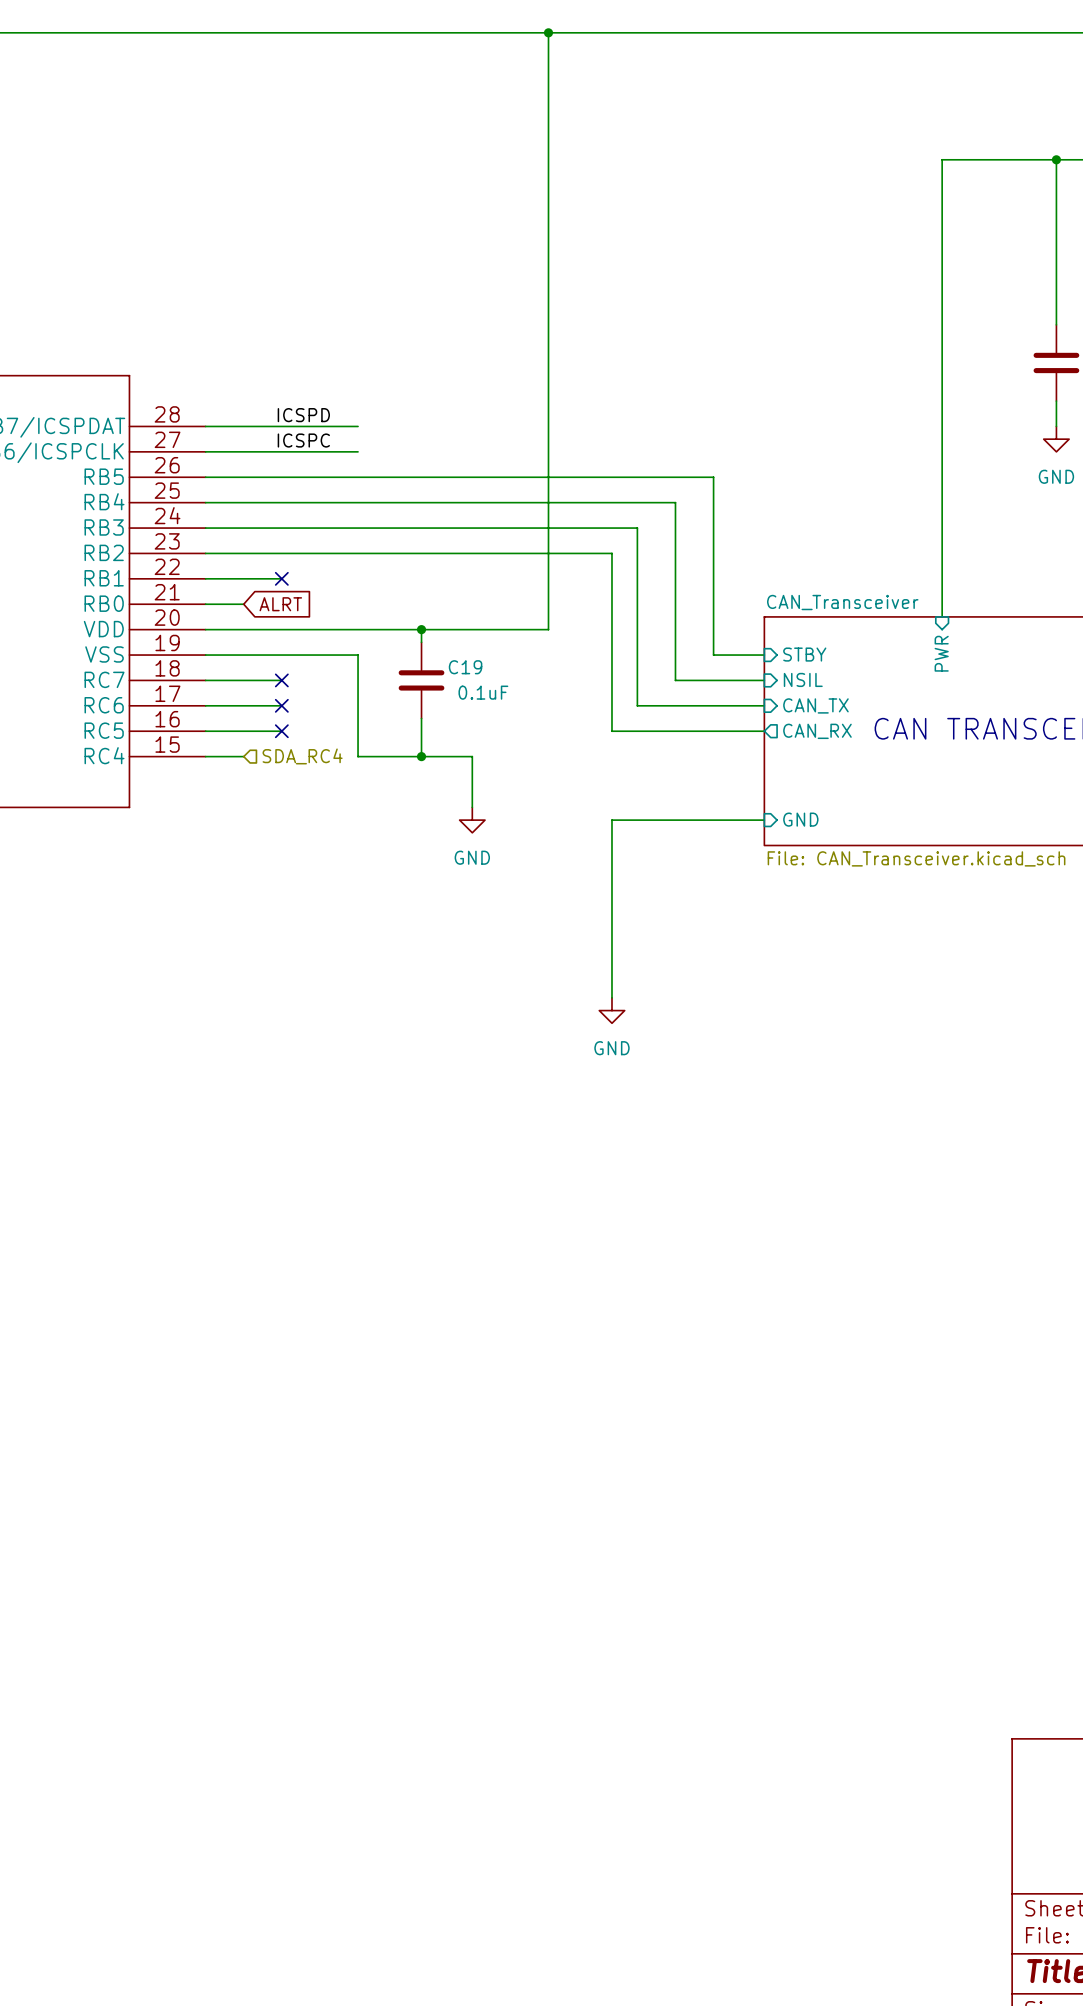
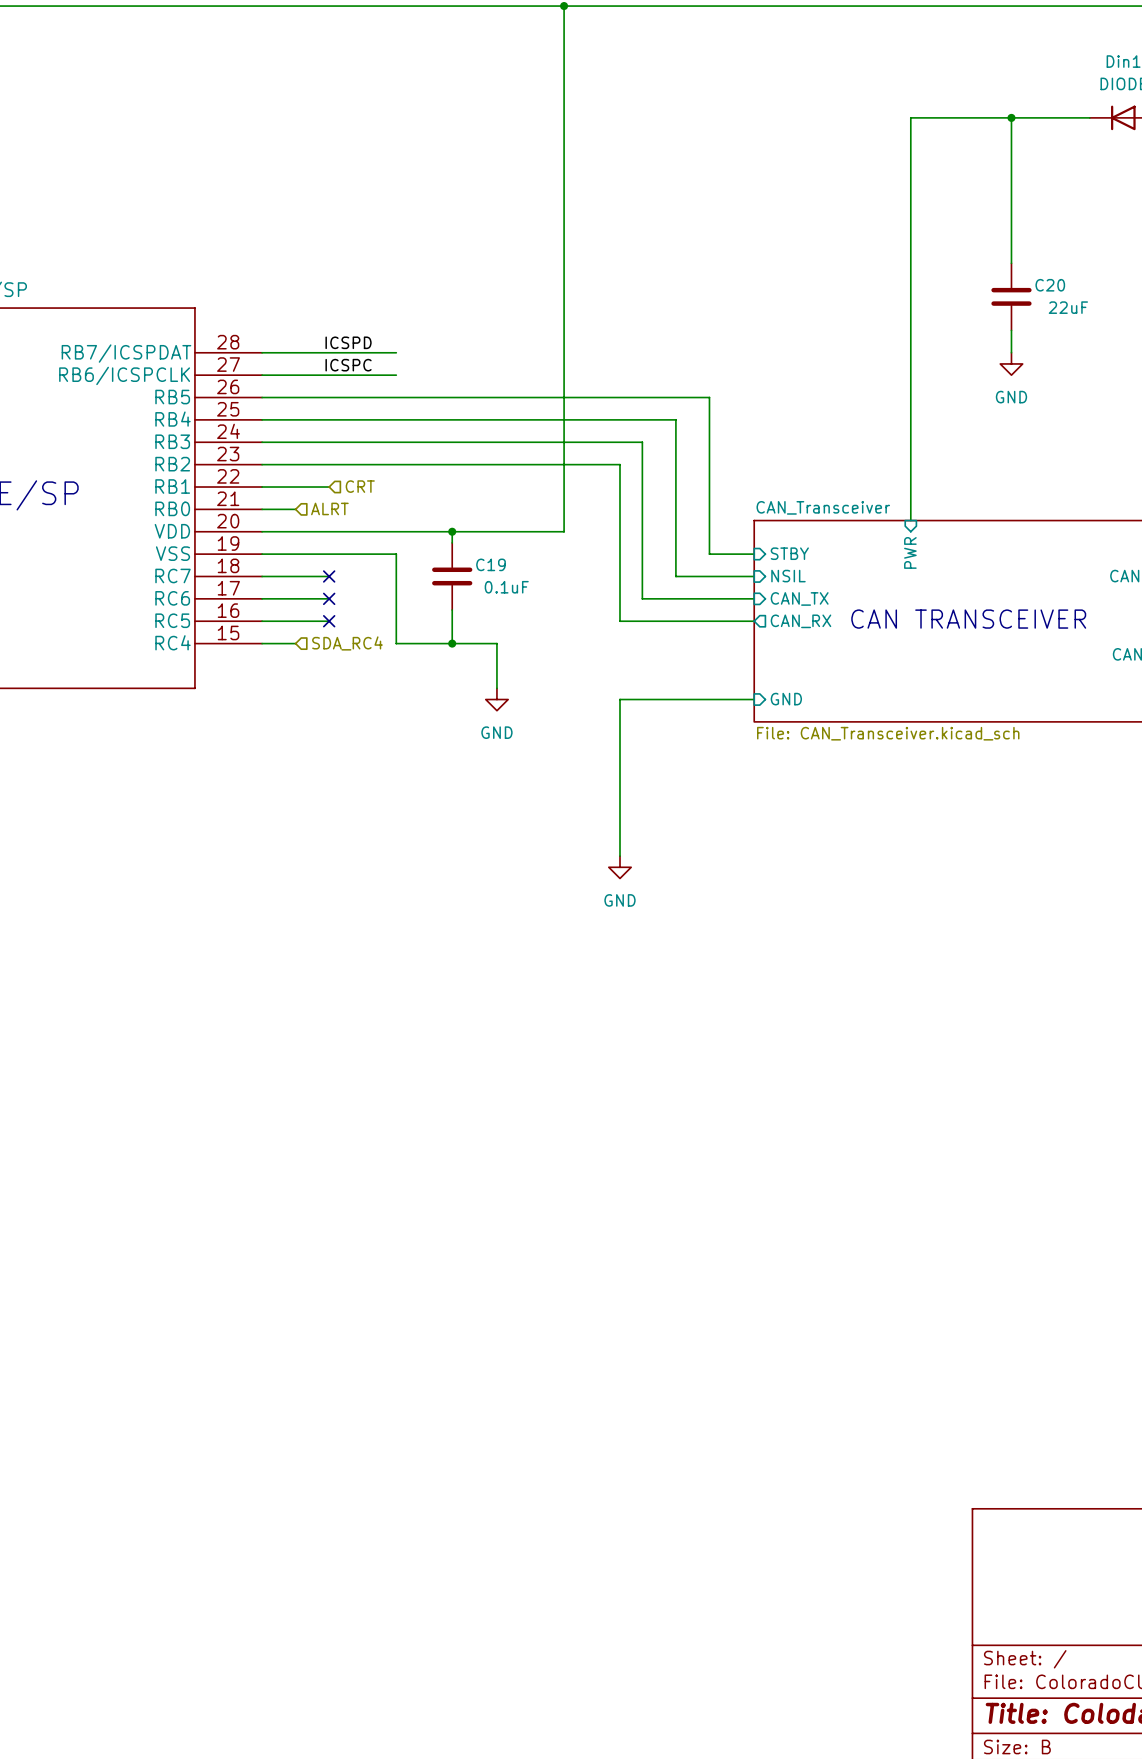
no-connect mark: (281, 578) -> none
hierarchical label: none -> CRT (360, 486)
hierarchical label: none -> ALRT (329, 508)
global label: ALRT (280, 604) -> none

